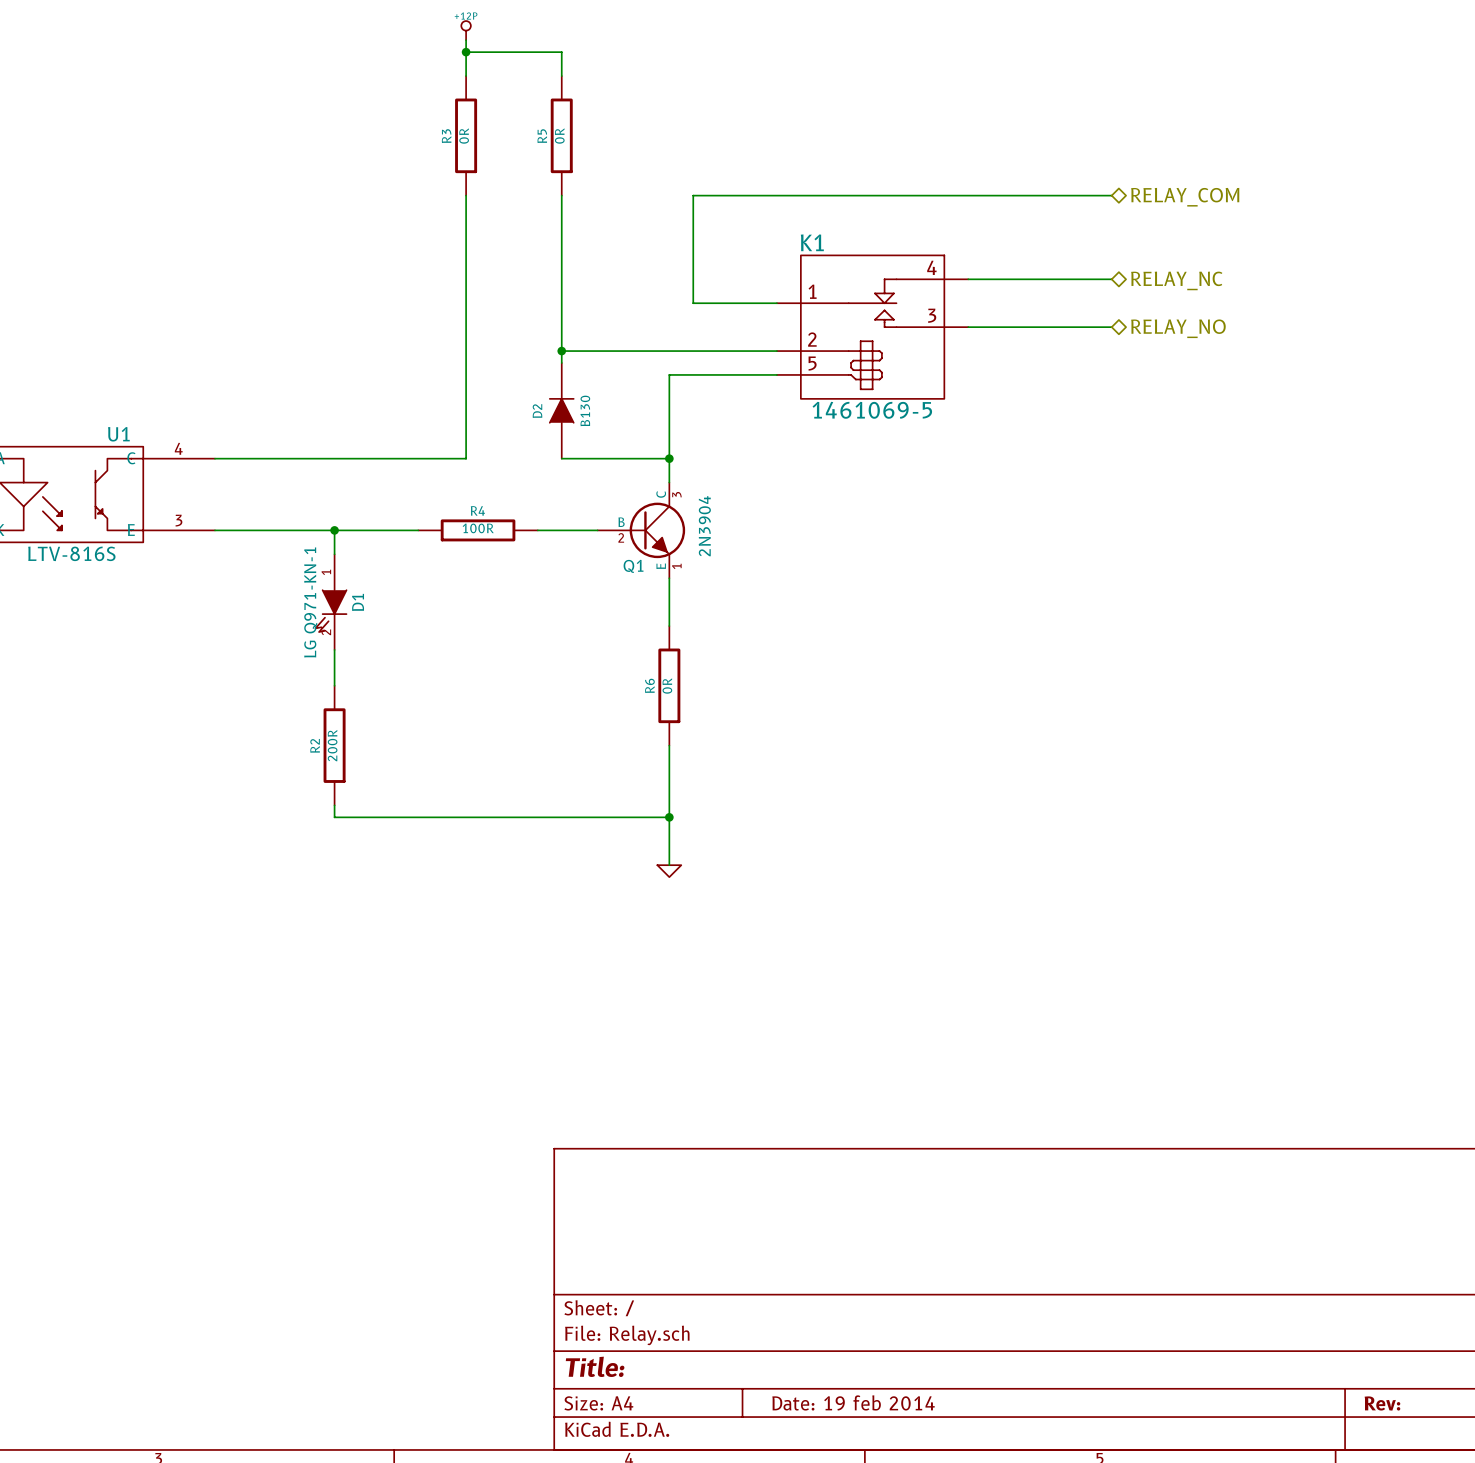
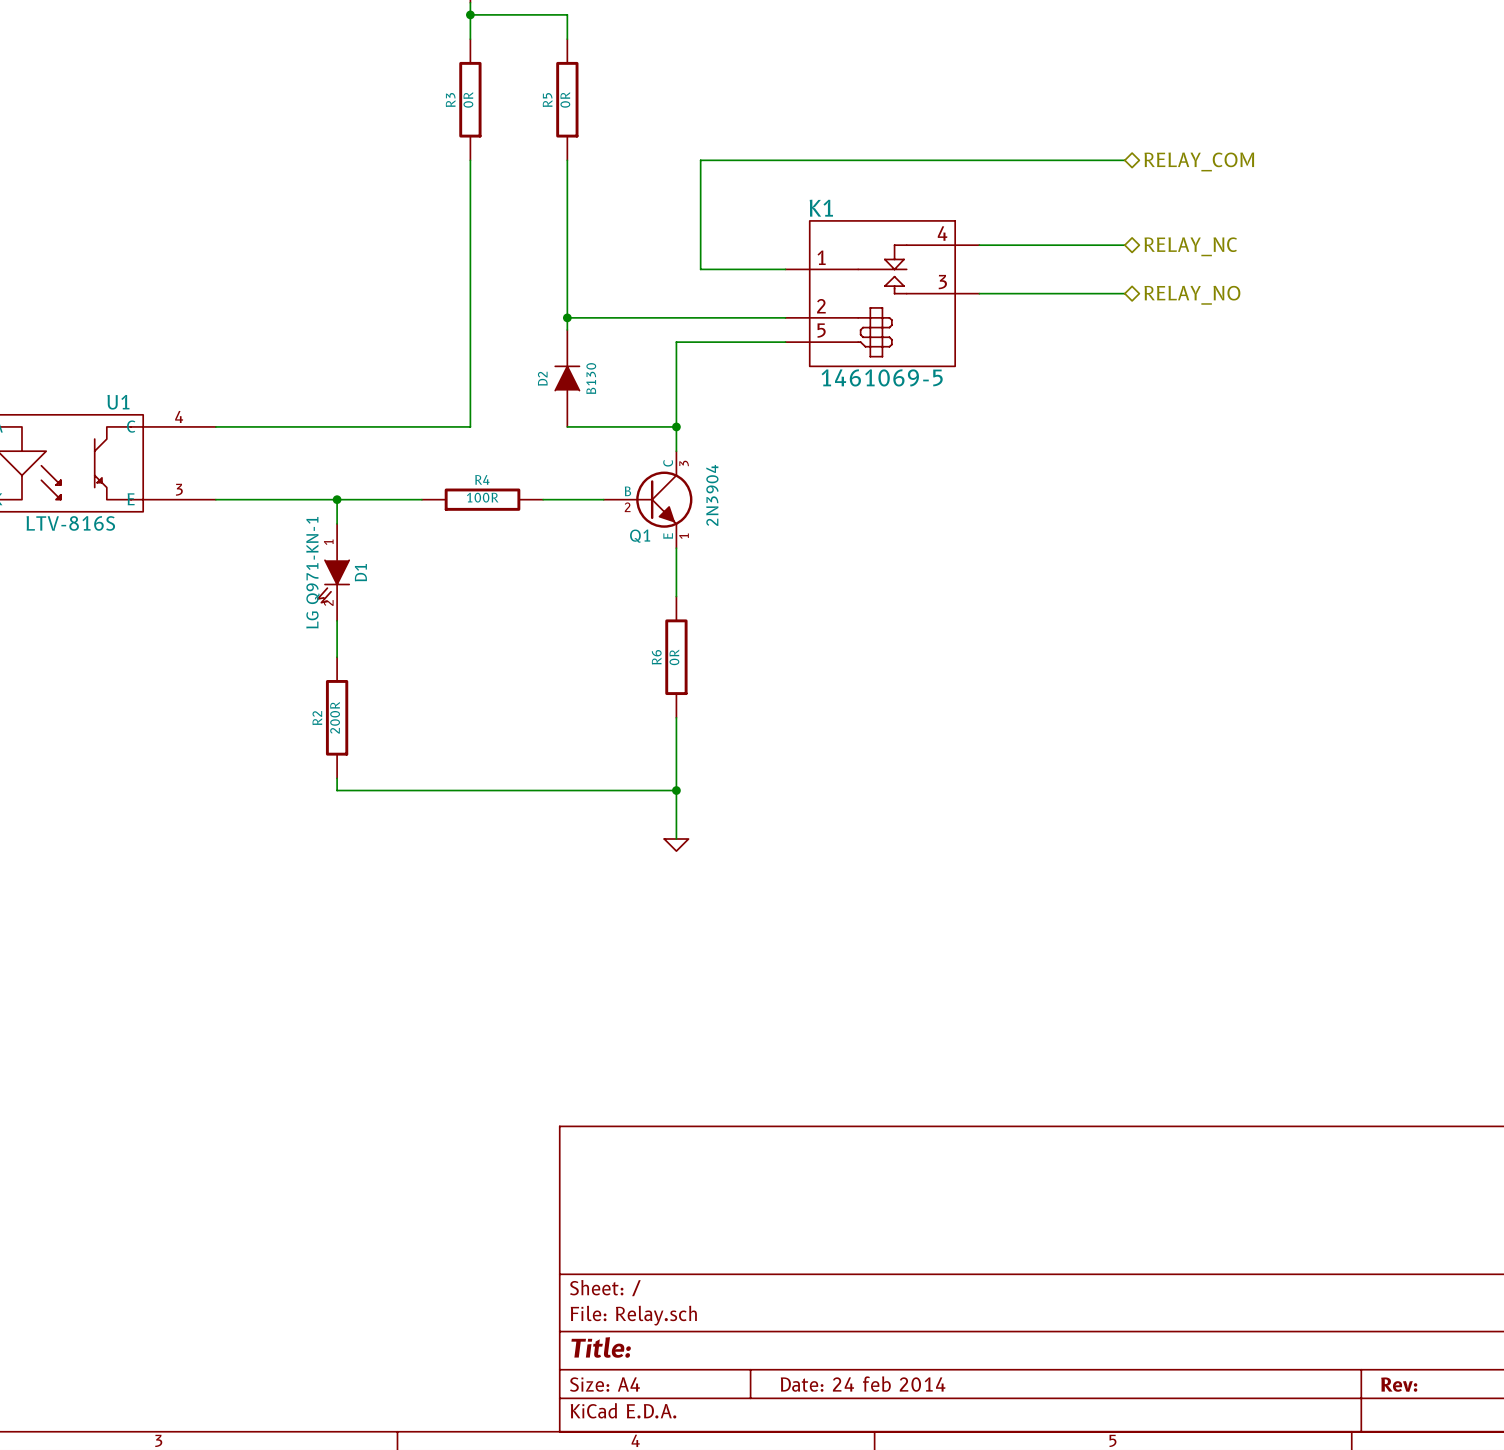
title block: Date: 19 feb 2014 (853, 1402) -> Date: 24 feb 2014 (863, 1384)

